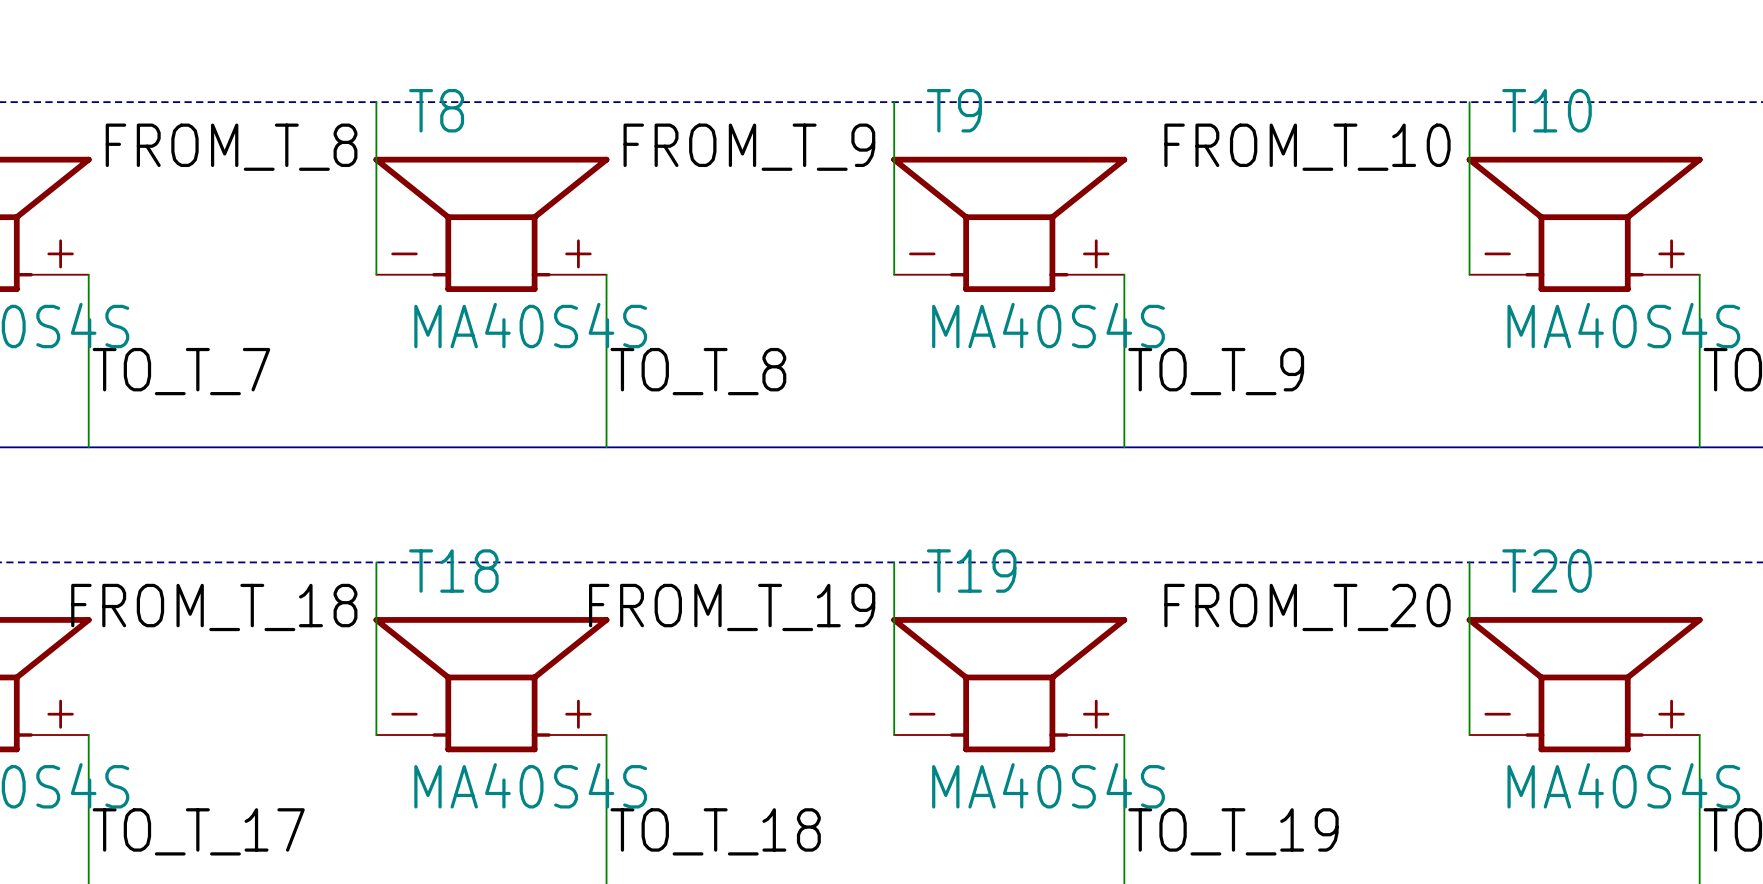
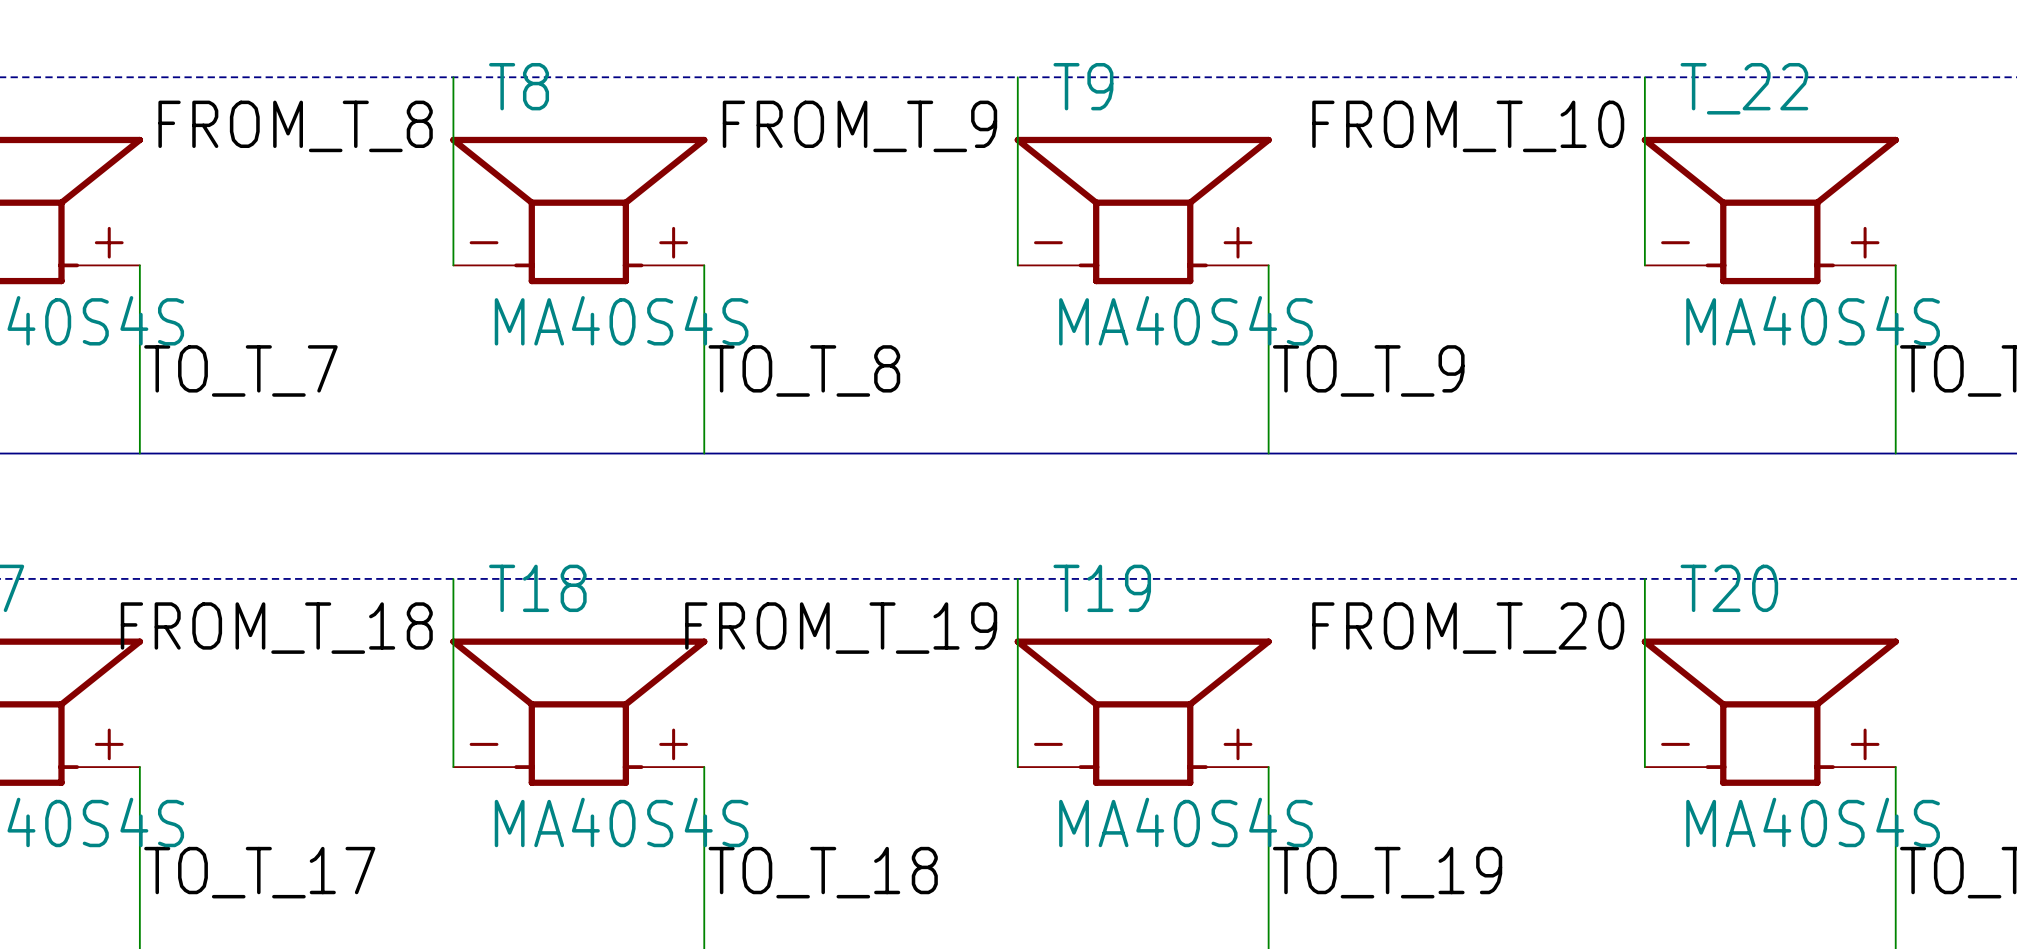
T10 name: T10 (1547, 110) -> T_22 (1744, 88)

